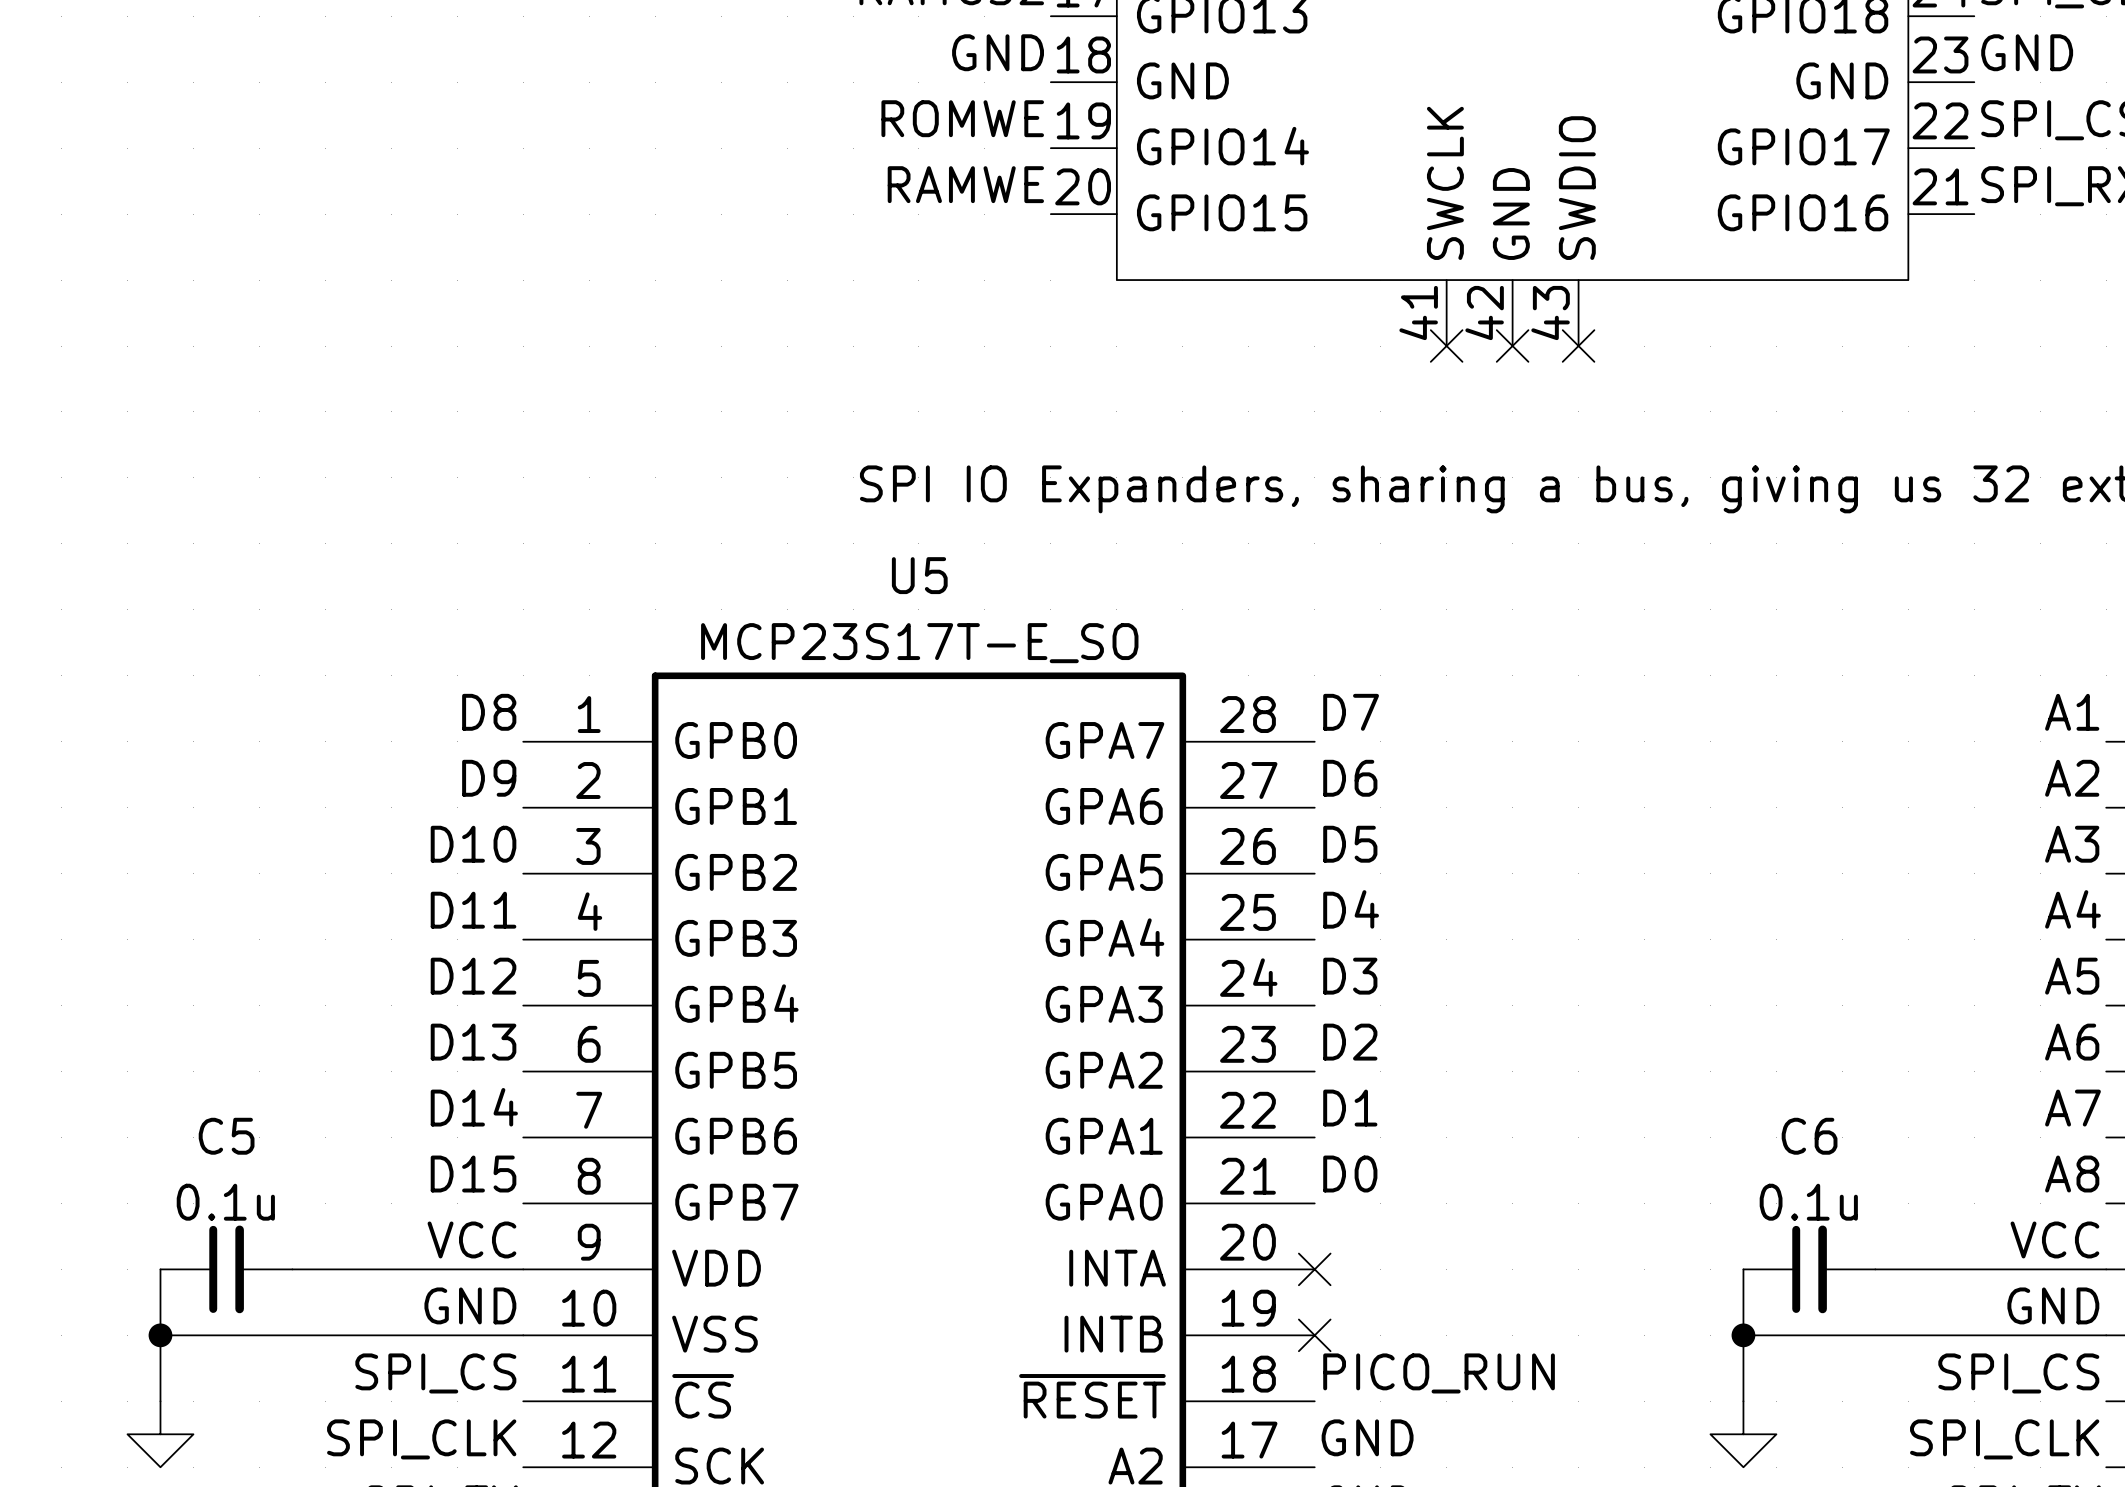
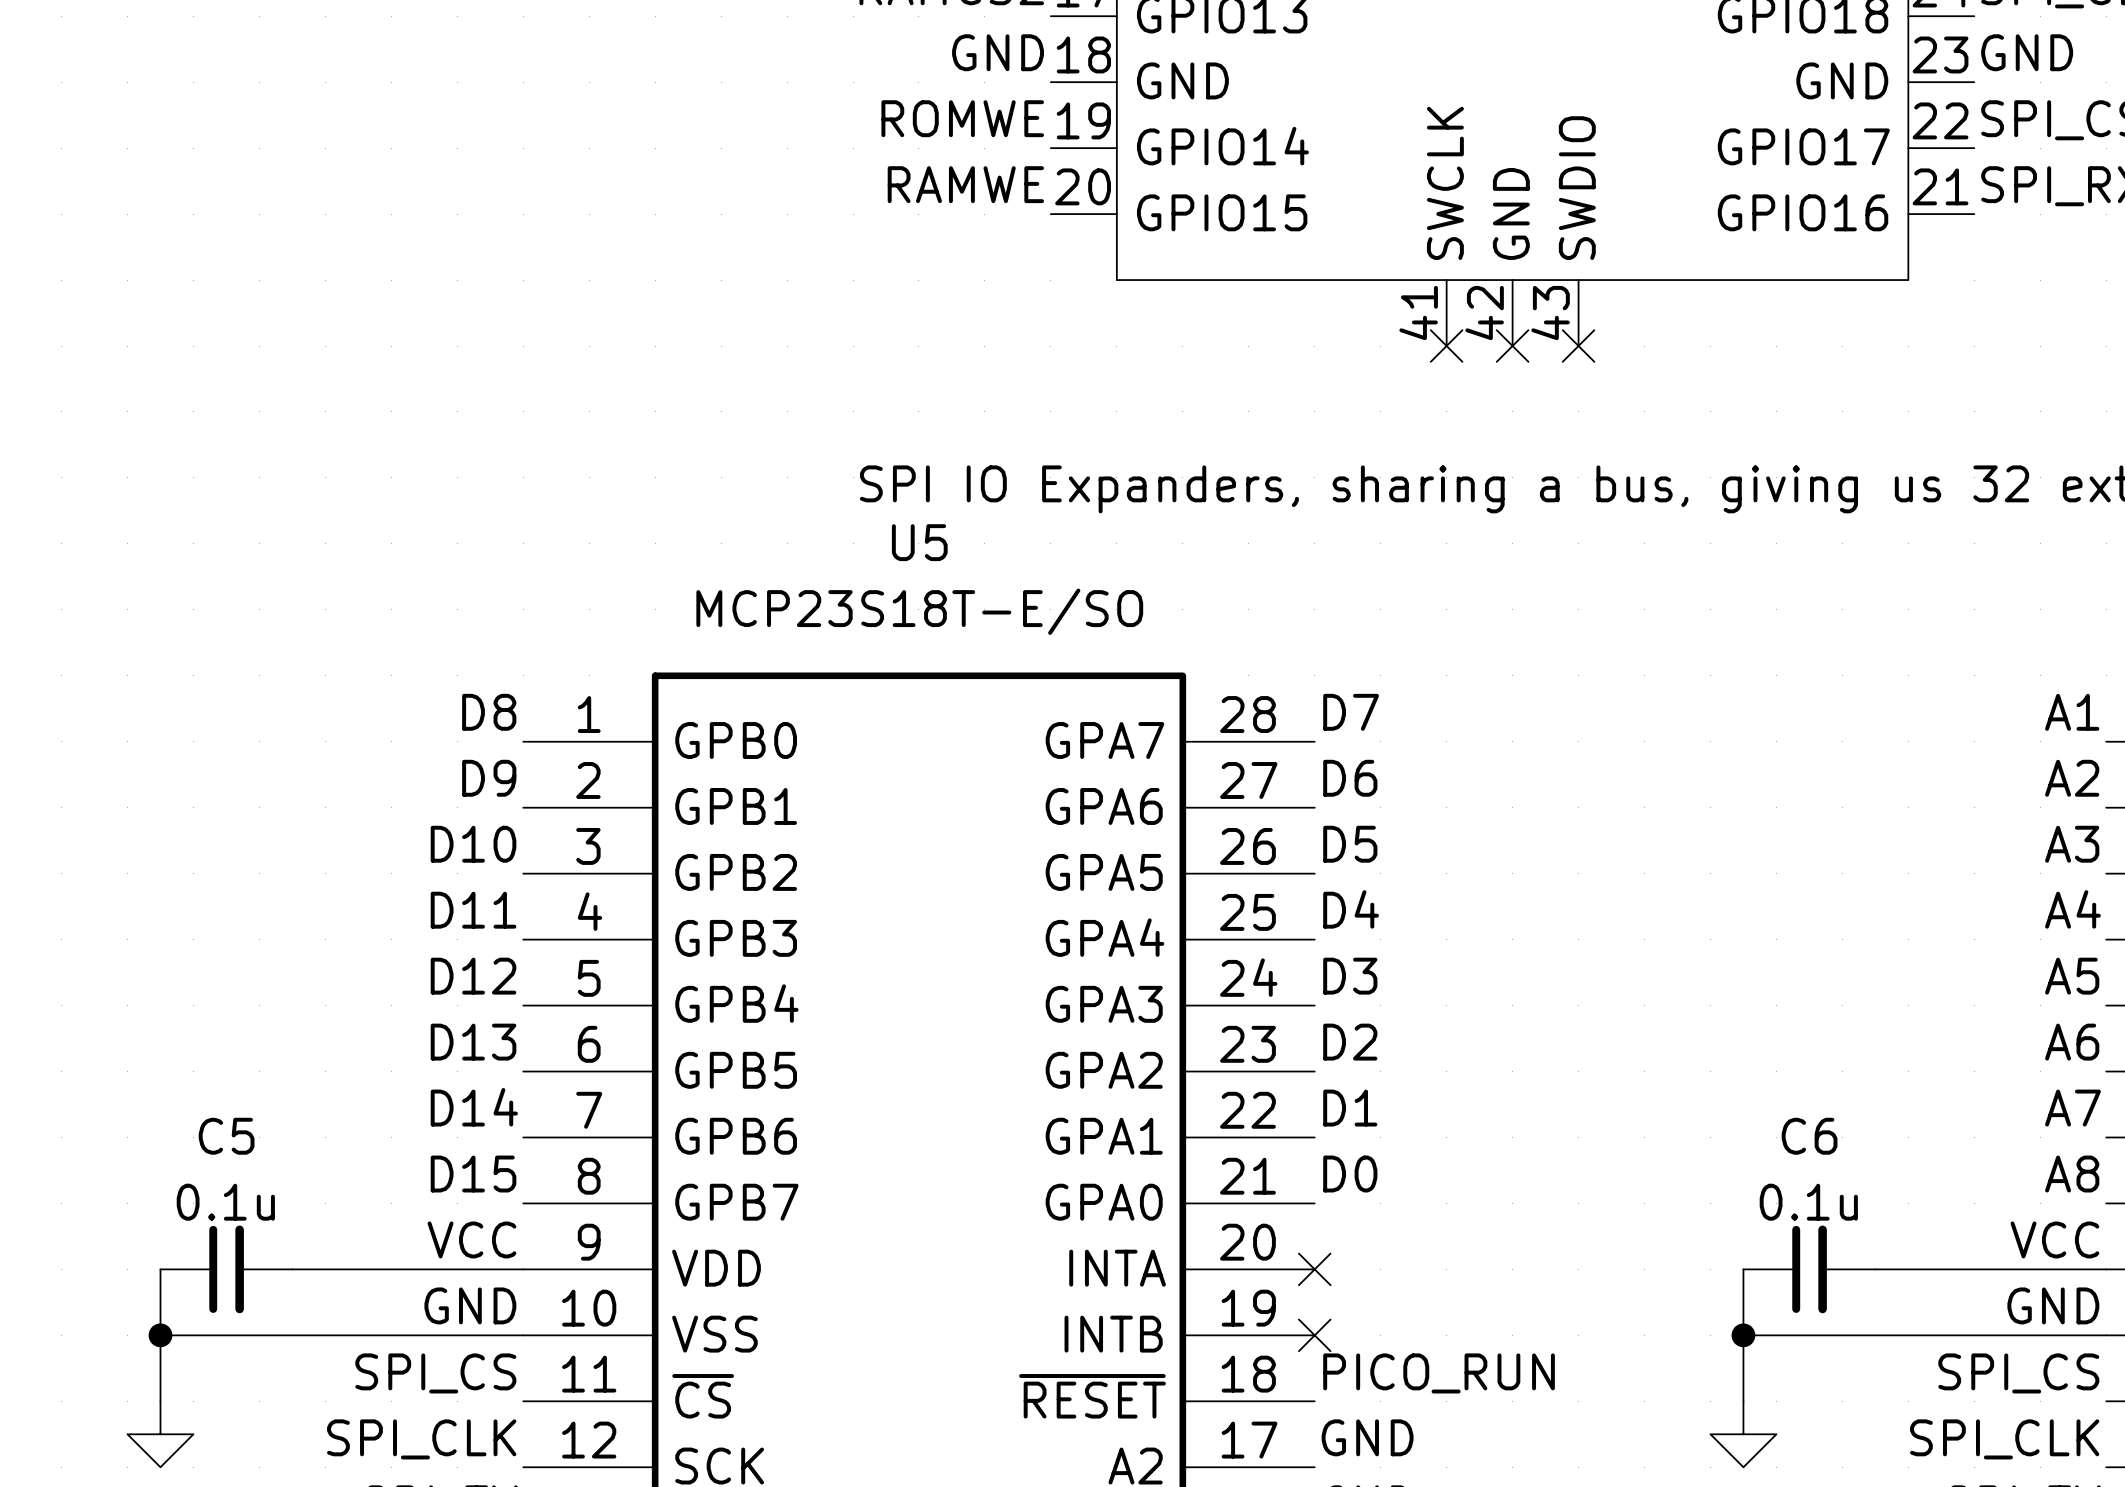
U5 name position: U5 (919, 575) -> U5 (919, 542)
U5 value: MCP23S17T-E_SO (919, 643) -> MCP23S18T-E/SO (919, 611)

